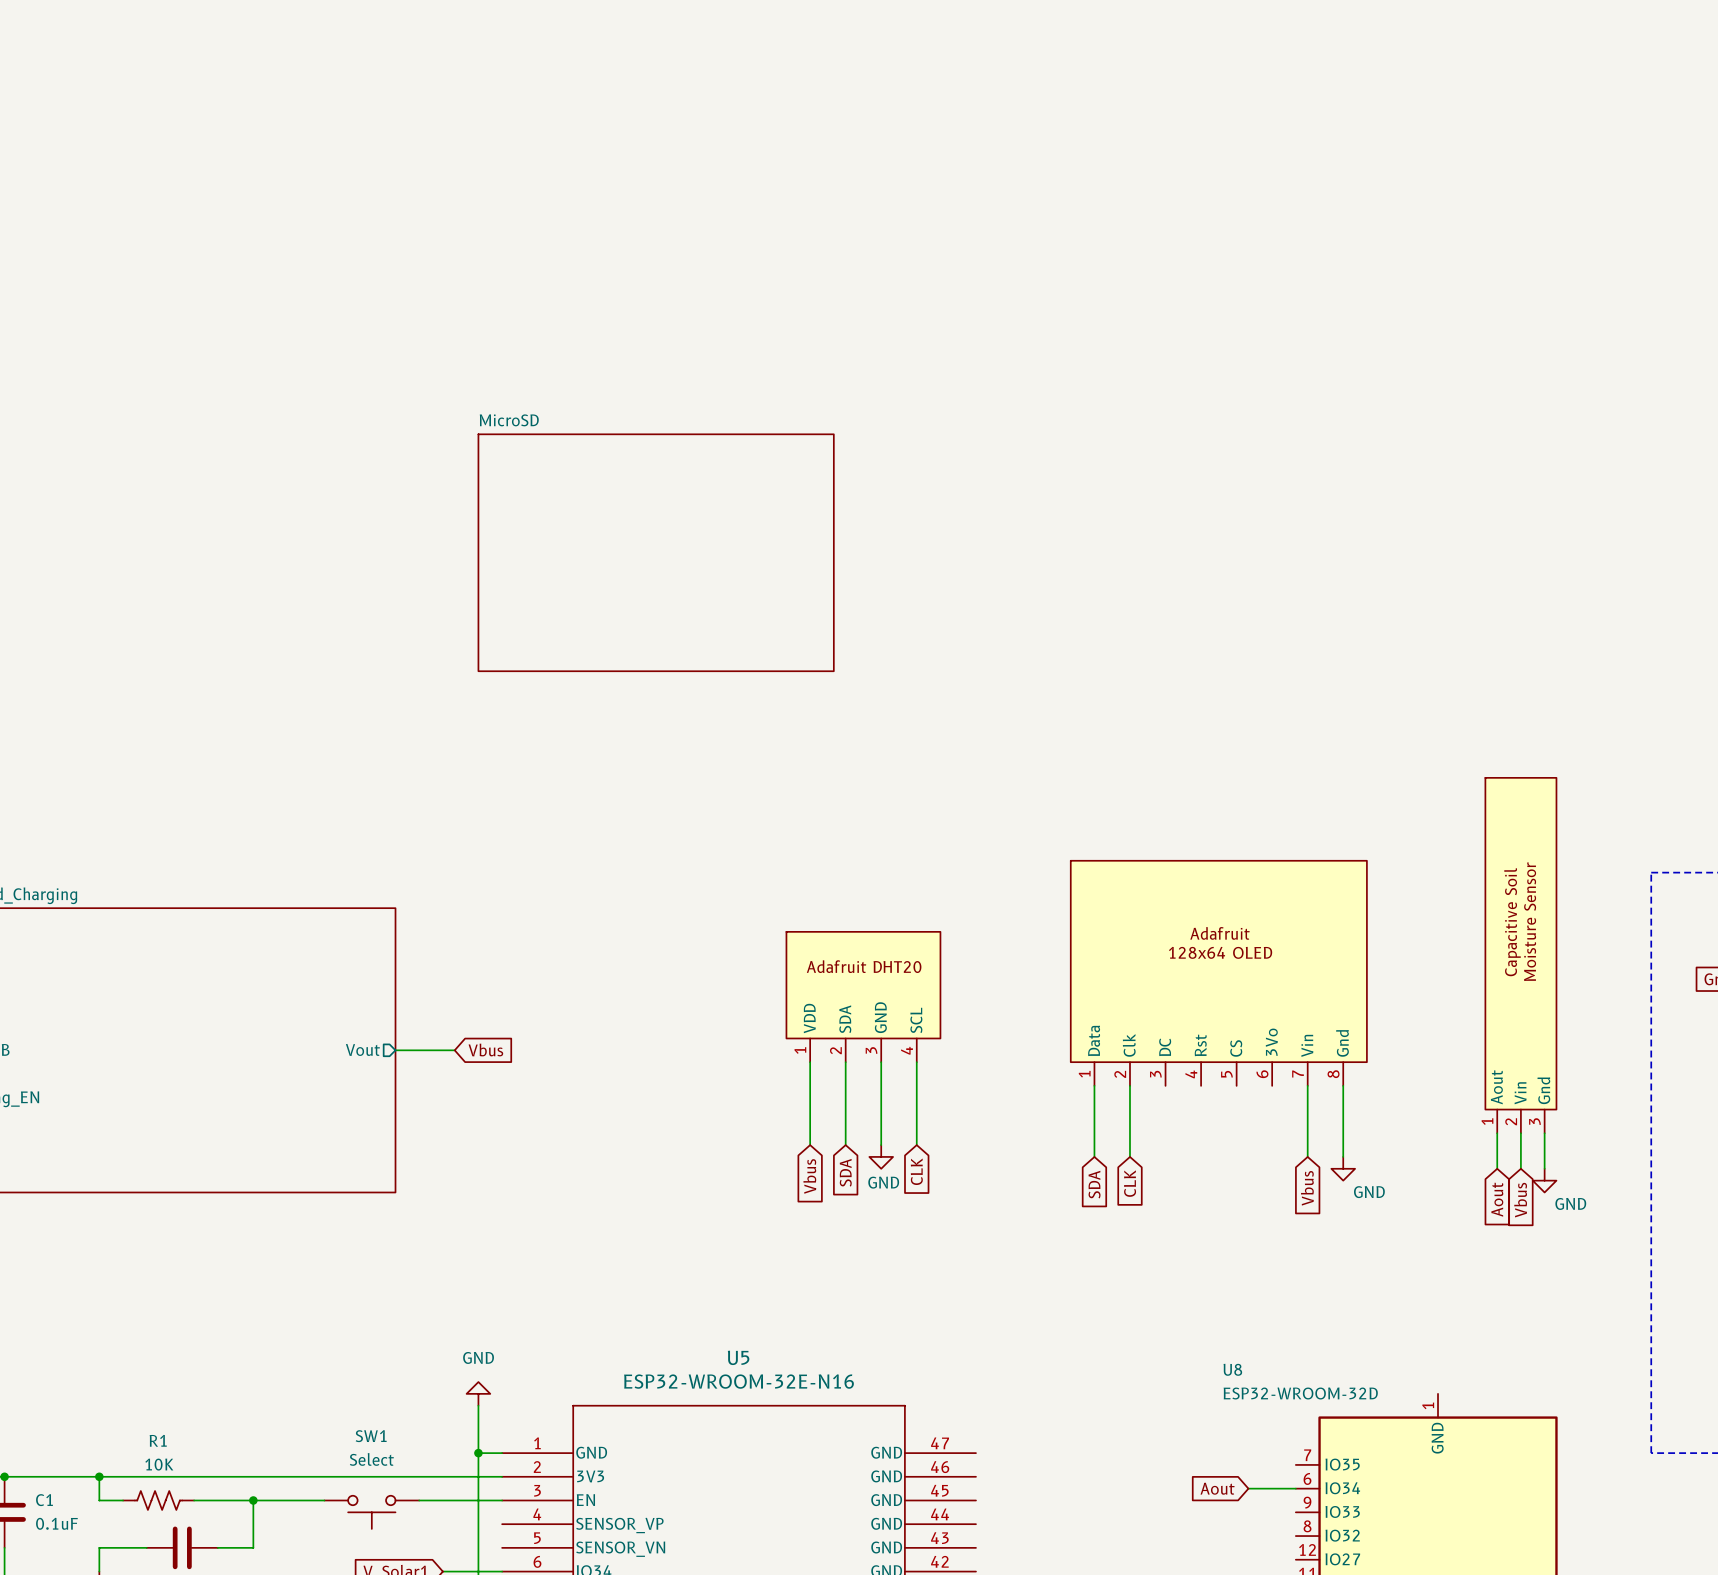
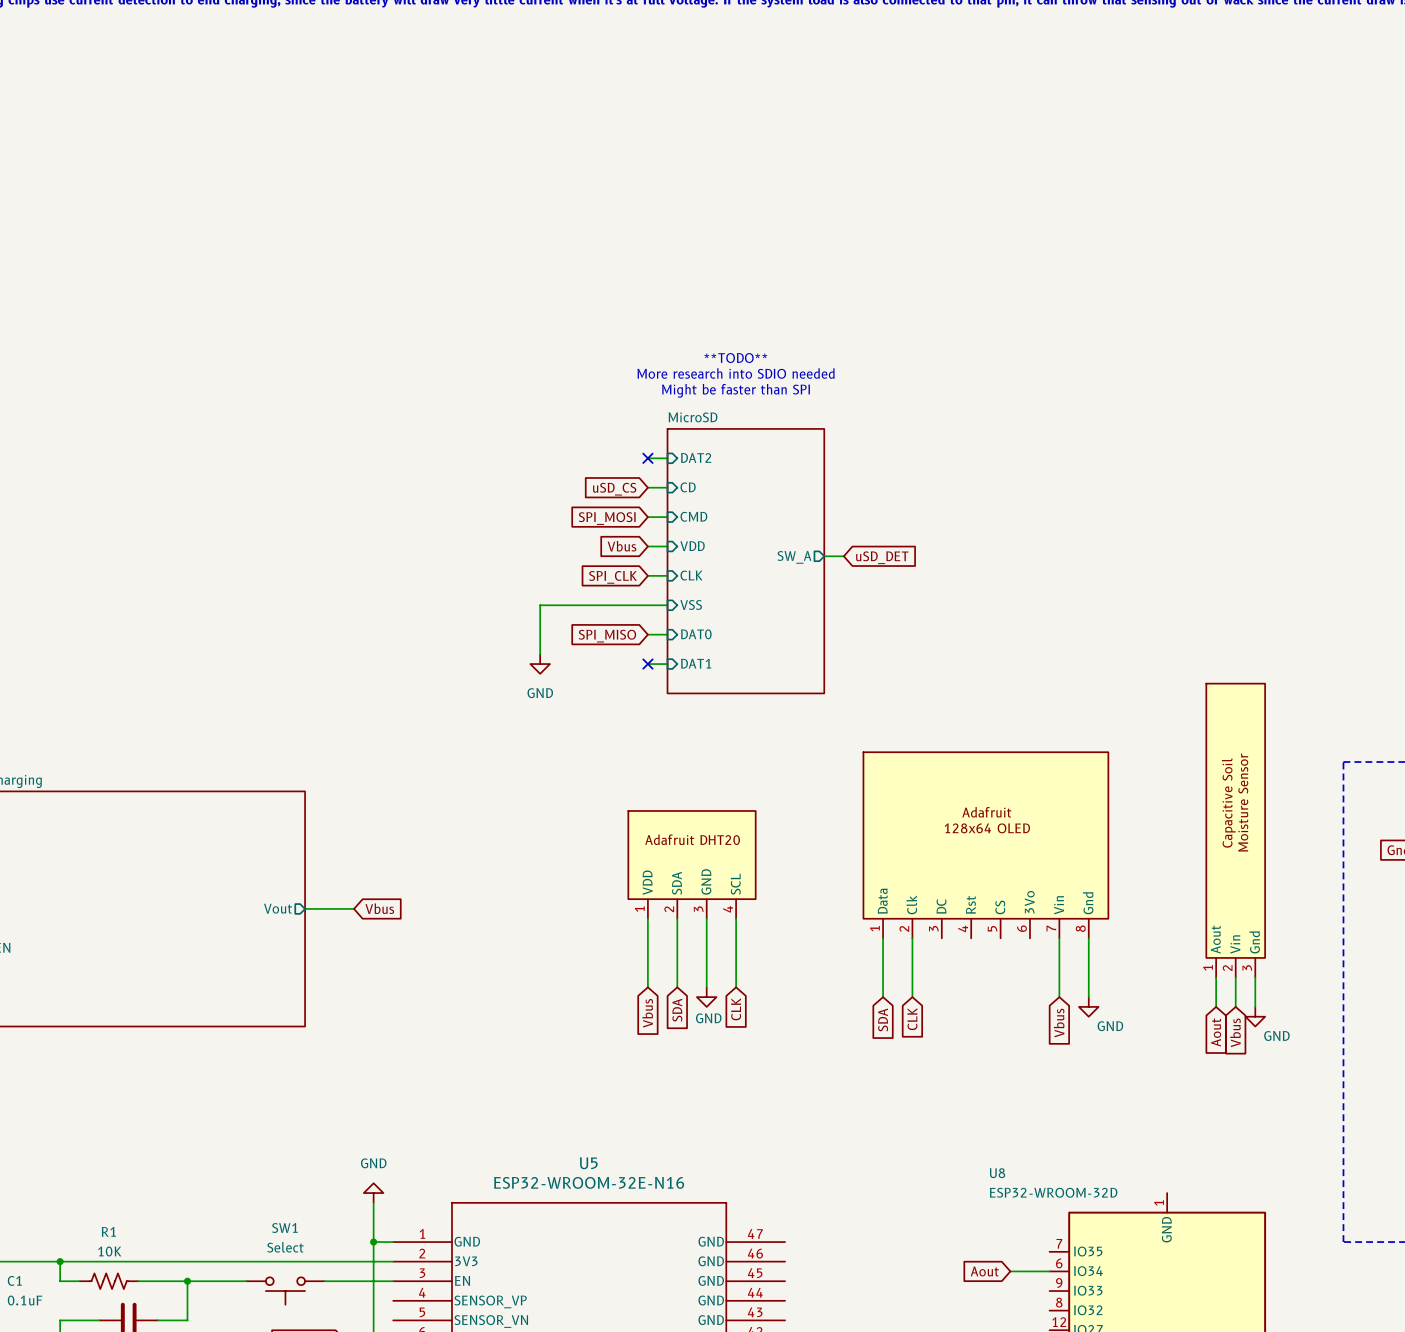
text: none -> **TODO** (735, 358)
text: none -> More research into SDIO needed (736, 373)
text: none -> Might be faster than SPI (736, 390)
sheet pin: none -> DAT2 (696, 457)
wire: none -> (647, 458) (667, 458)
no-connect mark: none -> (647, 458)
wire: none -> (647, 487) (667, 487)
sheet pin: none -> CD (688, 487)
global label: none -> uSD_CS (614, 489)
sheet MicroSD: (656, 552) -> none
wire: none -> (647, 517) (667, 517)
sheet pin: none -> CMD (693, 516)
global label: none -> SPI_MOSI (607, 518)
global label: none -> Vbus (621, 546)
sheet pin: none -> VDD (692, 546)
wire: none -> (647, 546) (667, 546)
wire: none -> (824, 556) (843, 556)
sheet pin: none -> SW_A (794, 557)
global label: none -> uSD_DET (882, 557)
sheet MicroSD: none -> (745, 561)
wire: none -> (647, 575) (667, 575)
sheet pin: none -> CLK (691, 575)
global label: none -> SPI_CLK (612, 577)
sheet pin: none -> VSS (691, 604)
wire: none -> (667, 605) (540, 605) (540, 654)
wire: none -> (647, 634) (667, 634)
sheet pin: none -> DAT0 (696, 634)
global label: none -> SPI_MISO (607, 636)
sheet pin: none -> DAT1 (696, 663)
power symbol: none -> GND (540, 664)
wire: none -> (647, 664) (667, 664)
no-connect mark: none -> (647, 664)

